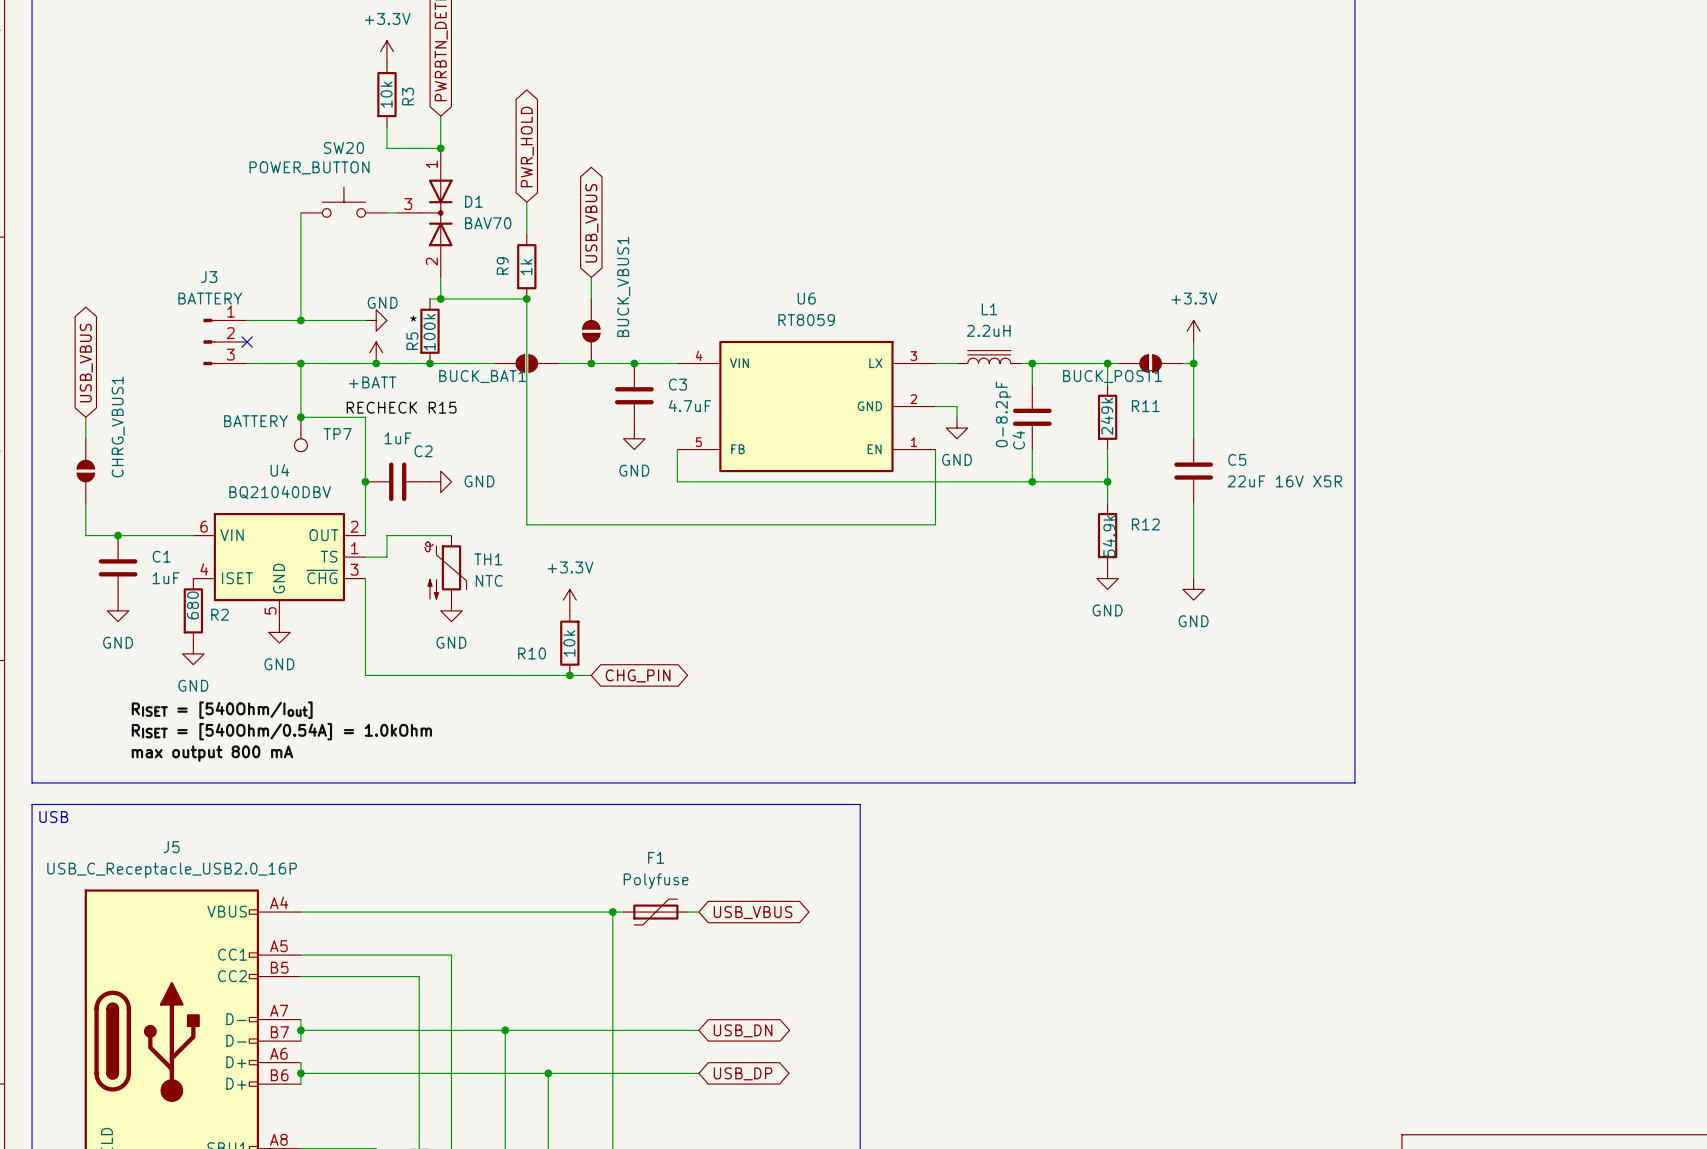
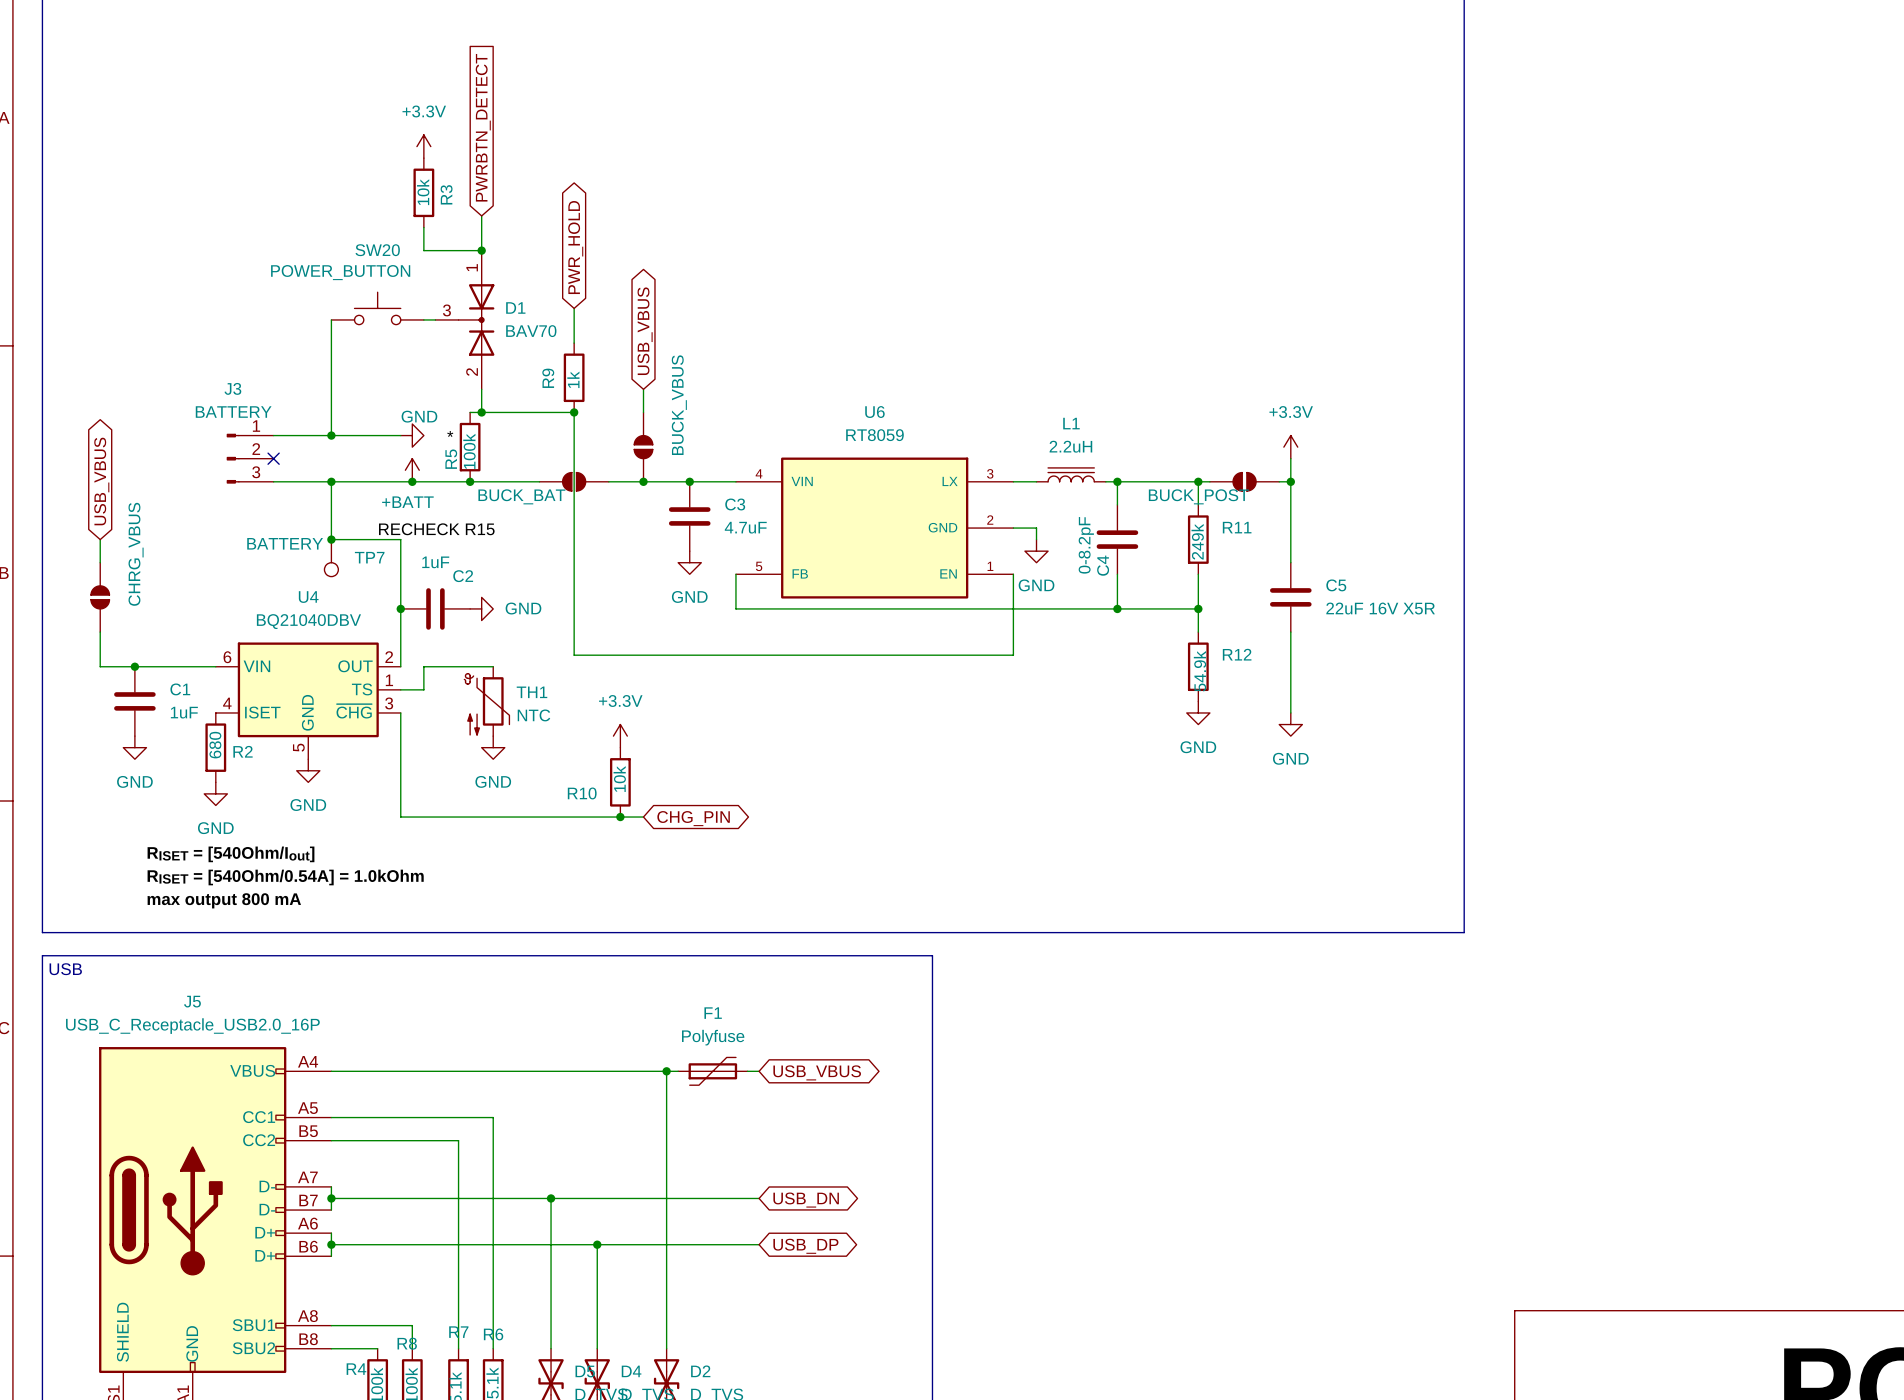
BUCK_VBUS1 name: BUCK_VBUS1 (623, 287) -> BUCK_VBUS (679, 405)
BUCK_BAT1 name: BUCK_BAT1 (482, 376) -> BUCK_BAT (521, 496)
BUCK_POST1 name: BUCK_POST1 (1112, 376) -> BUCK_POST (1198, 496)
CHRG_VBUS1 name: CHRG_VBUS1 (118, 427) -> CHRG_VBUS (136, 554)

